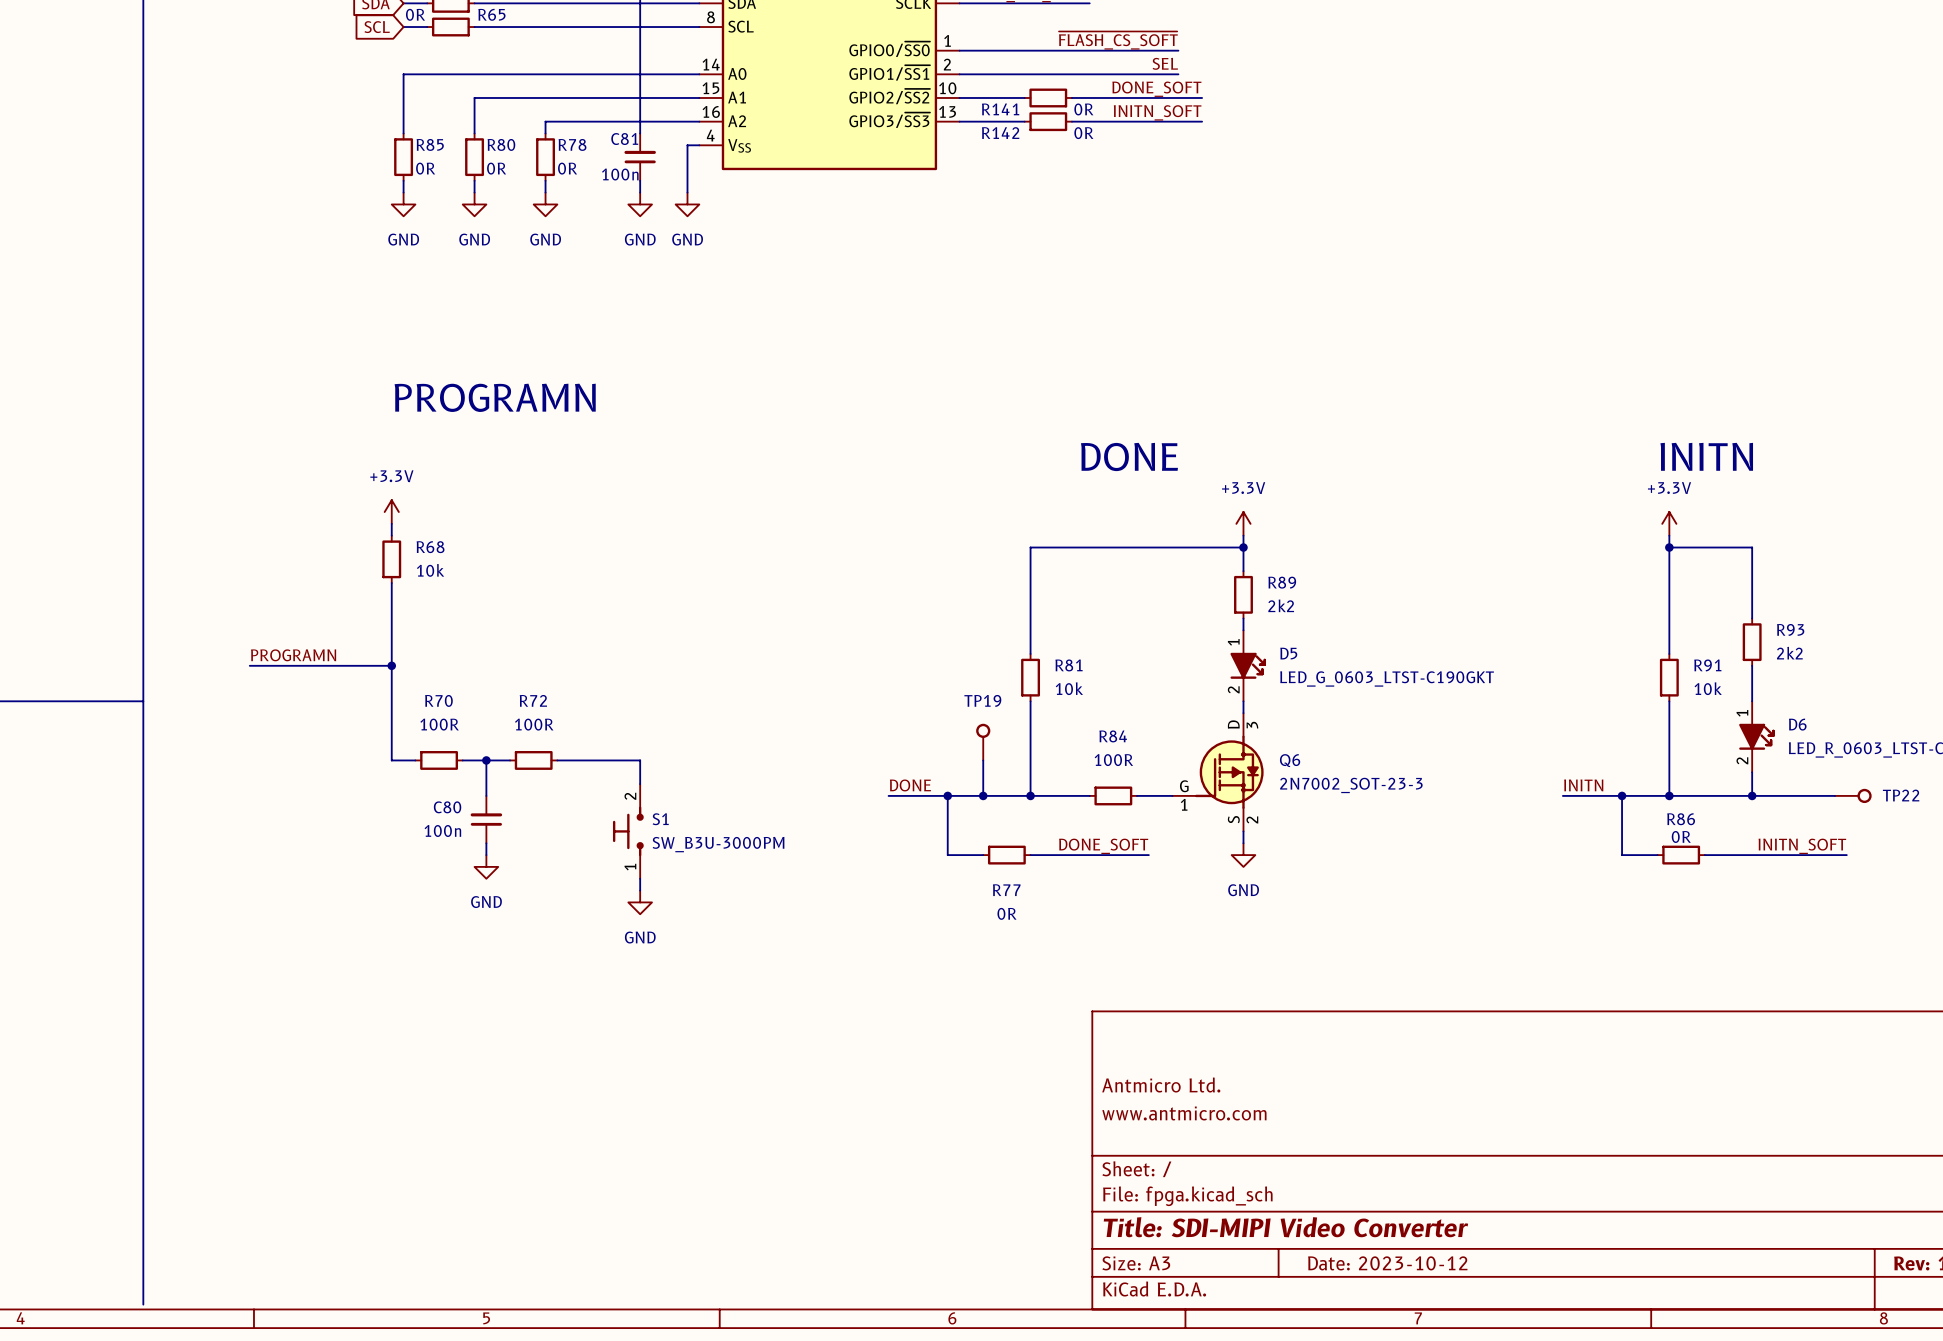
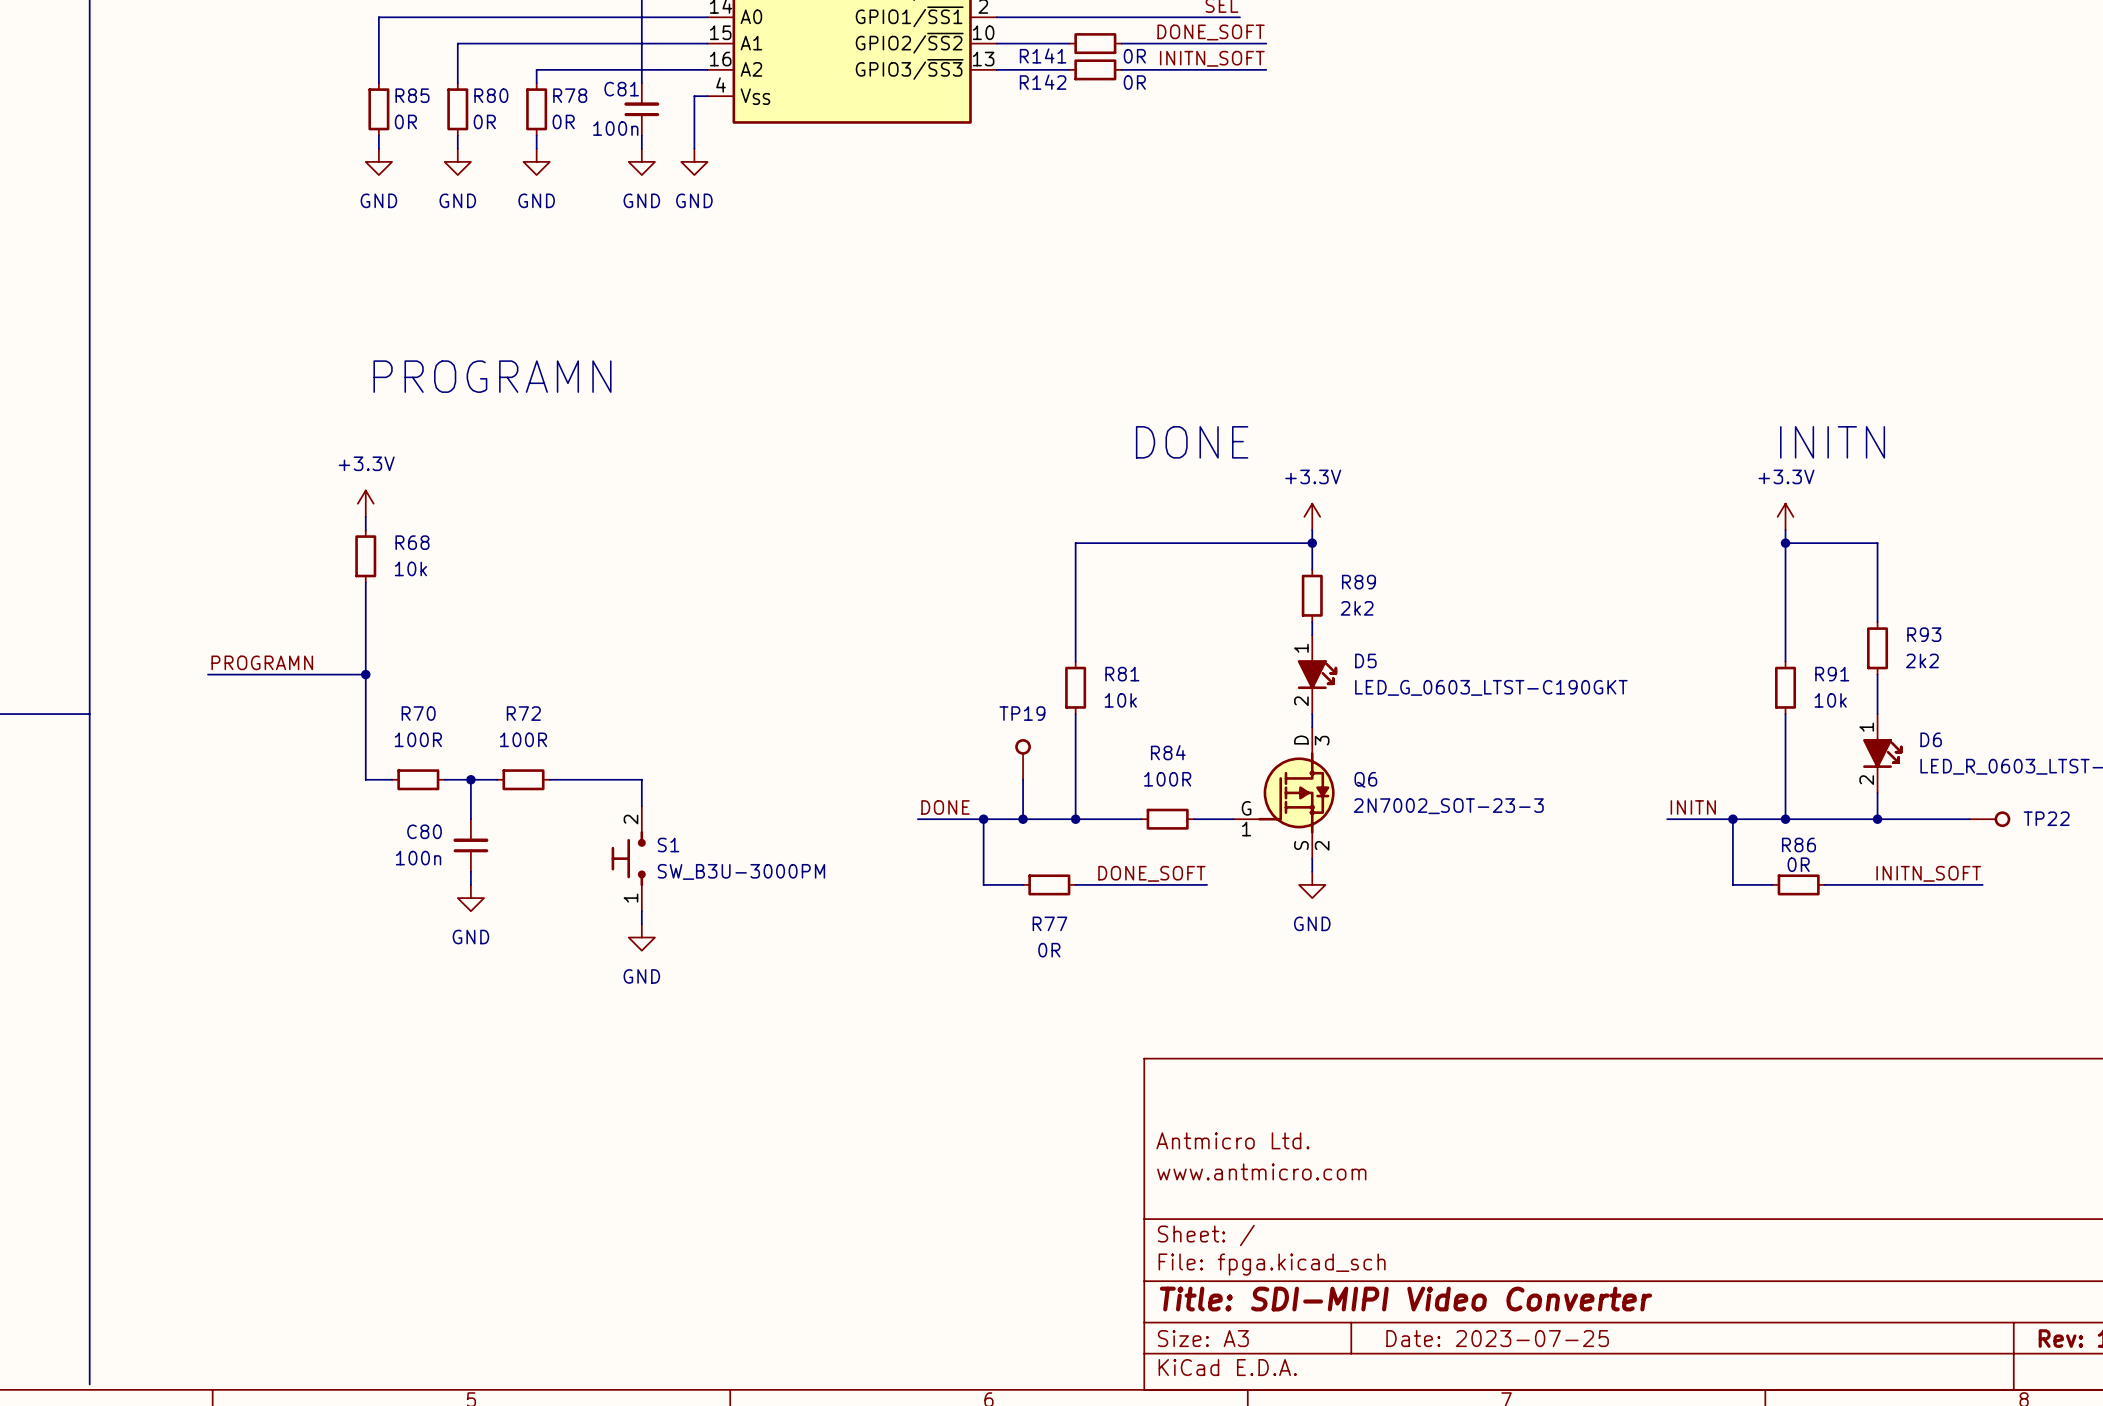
title block: Date: 2023-10-12 (1387, 1263) -> Date: 2023-07-25 (1497, 1338)

